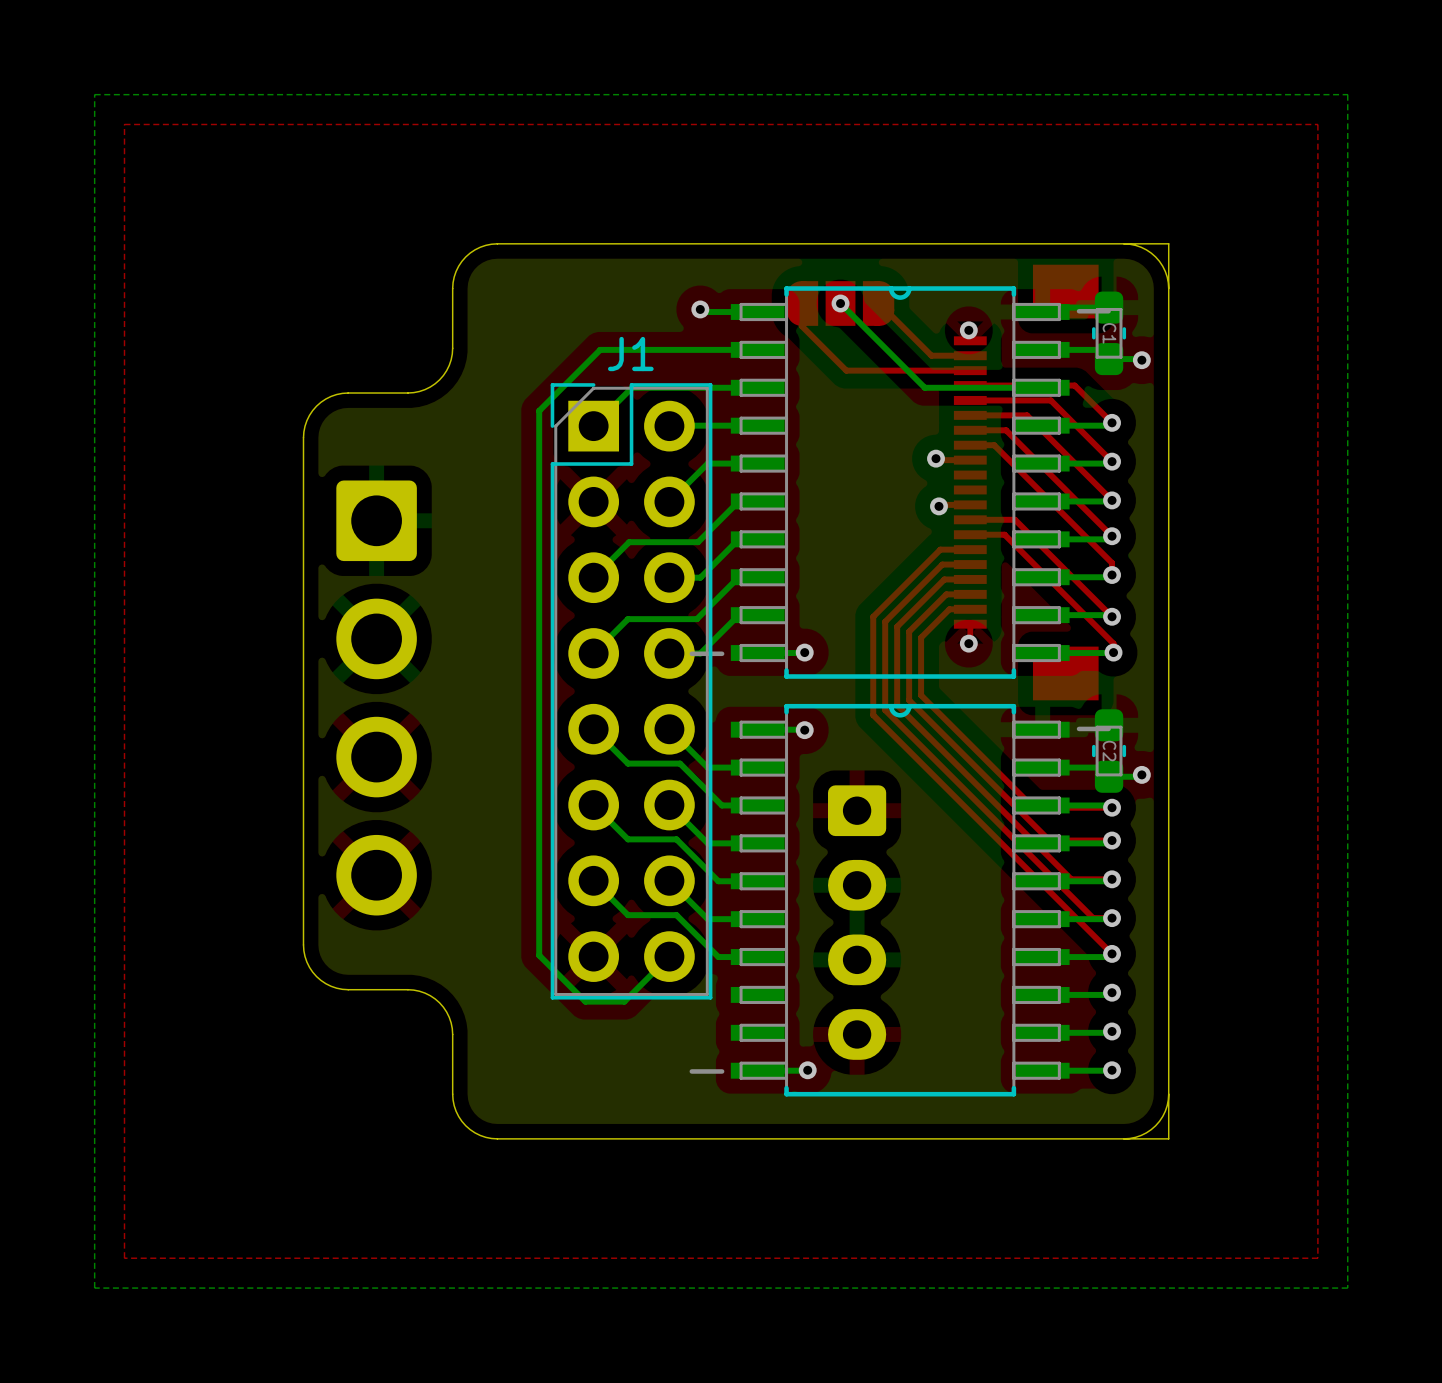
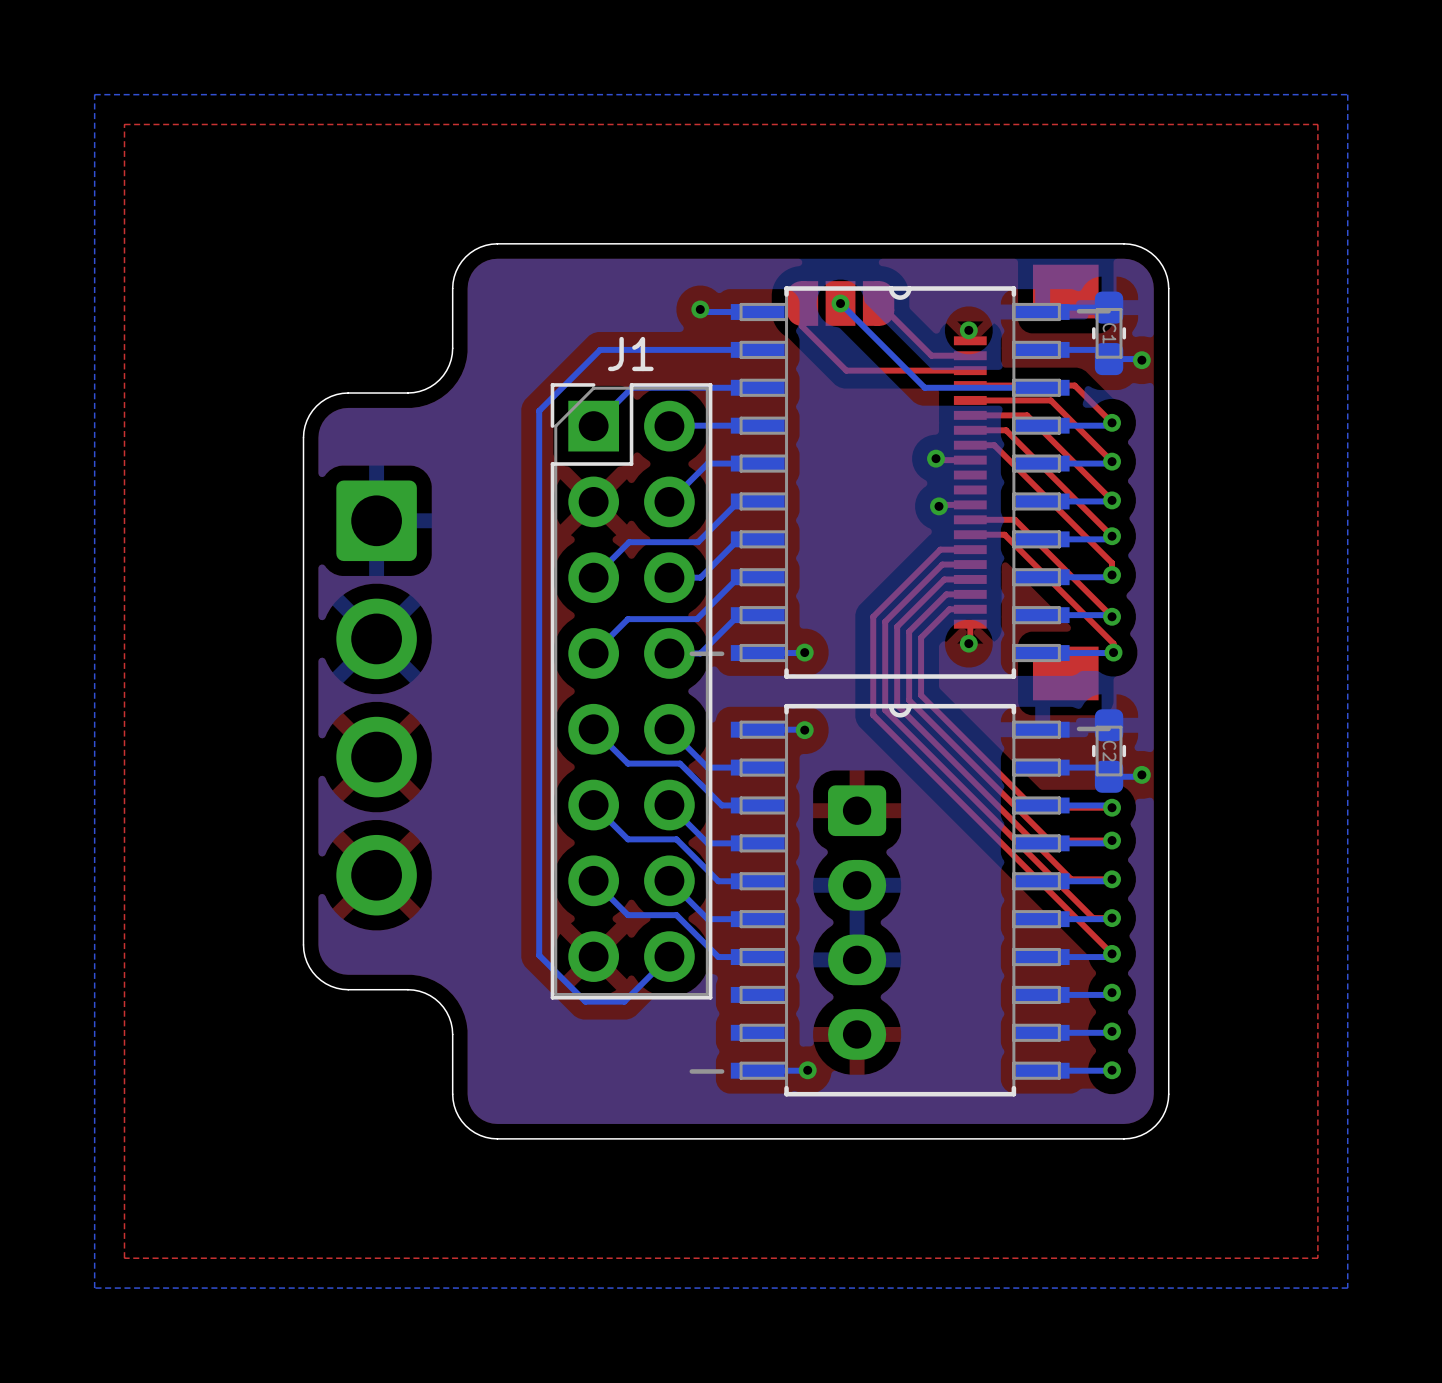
board edge: (1123, 243) (1168, 243) (1168, 288) -> none
board edge: (1168, 1094) (1168, 1138) (1123, 1138) -> none

